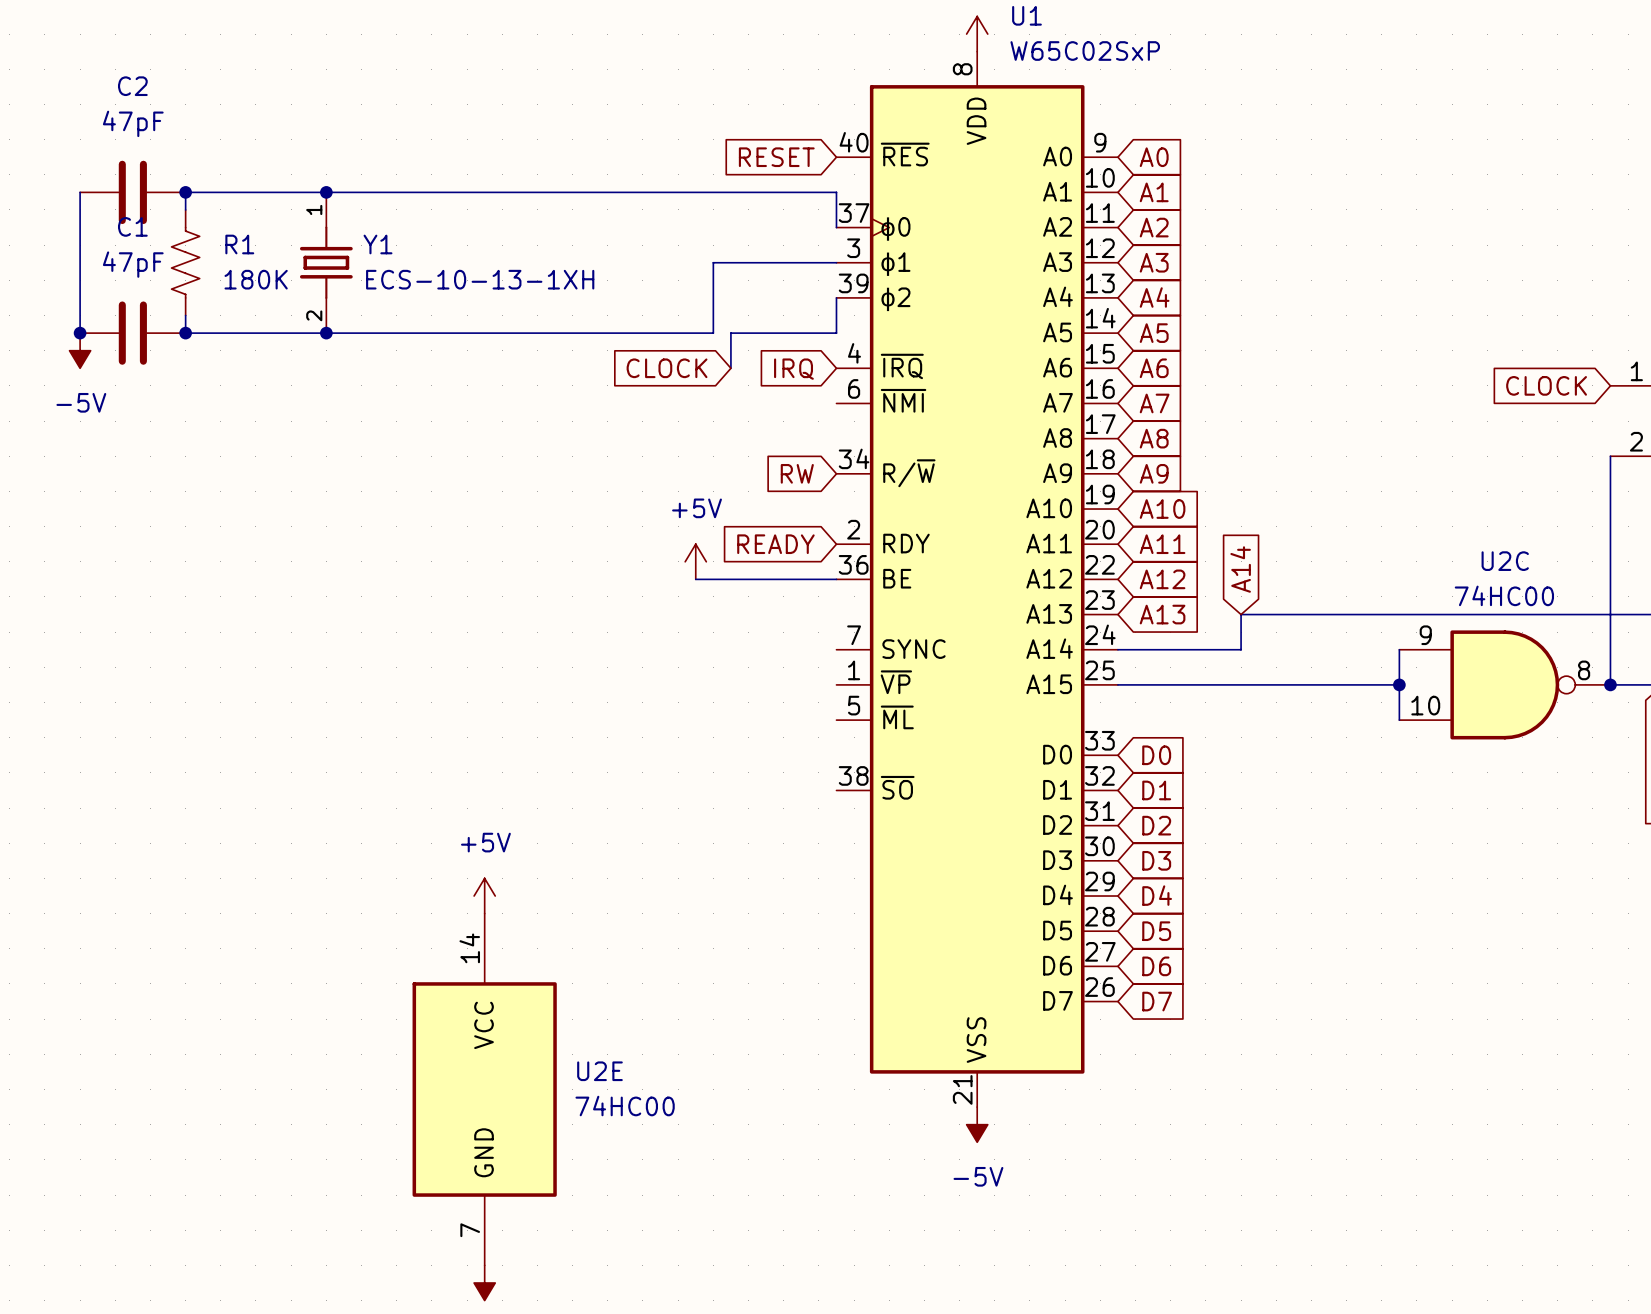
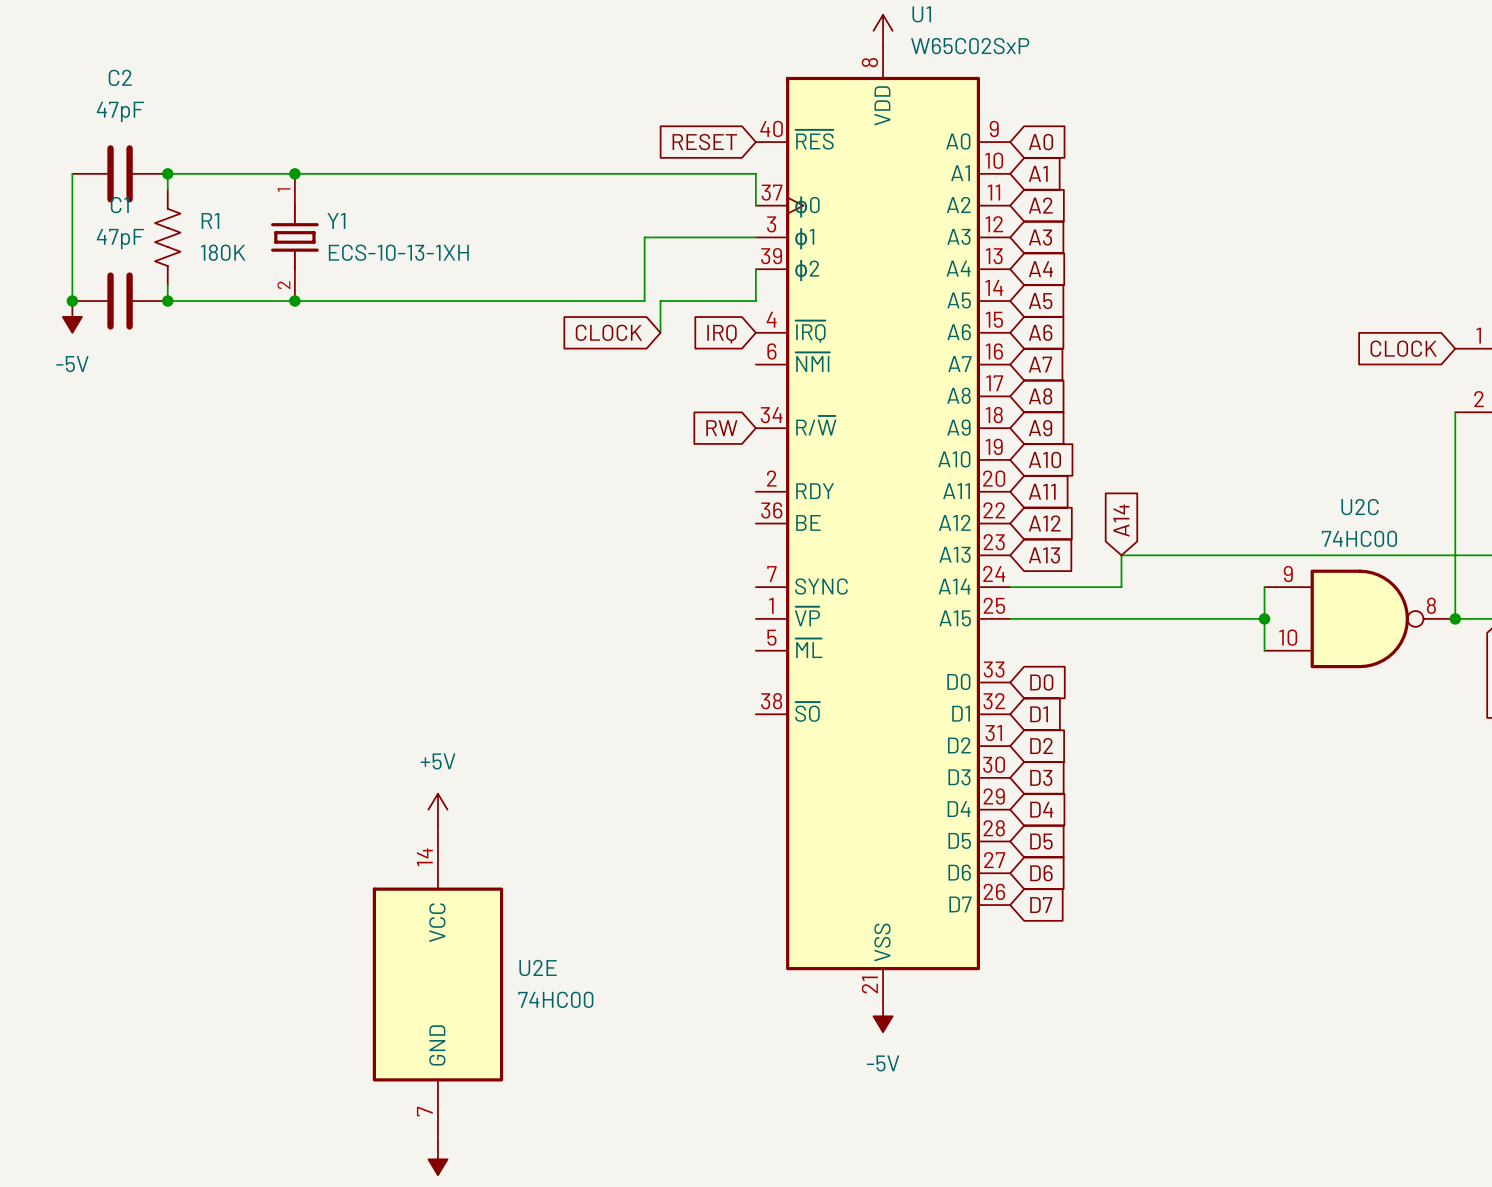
global label: READY (775, 544) -> none
power symbol: +5V (695, 561) -> none
wire: (695, 579) (836, 579) -> none

